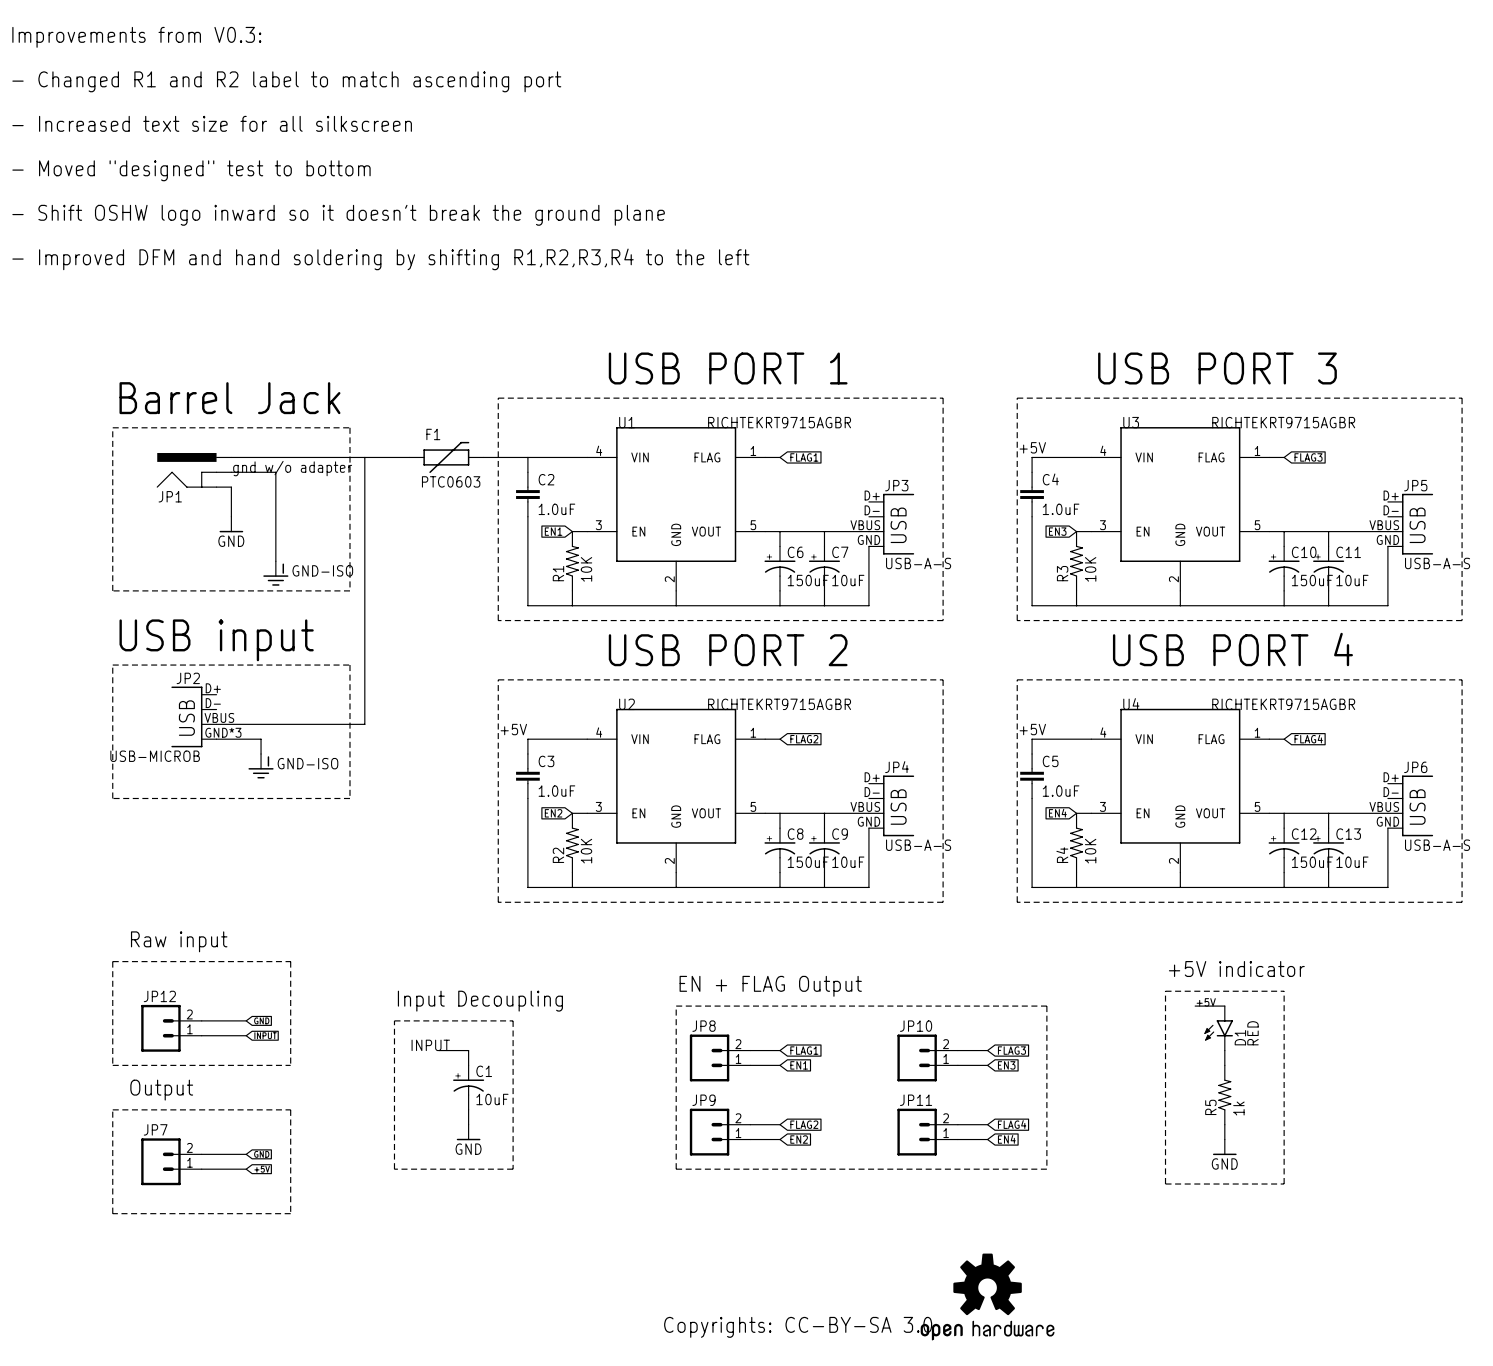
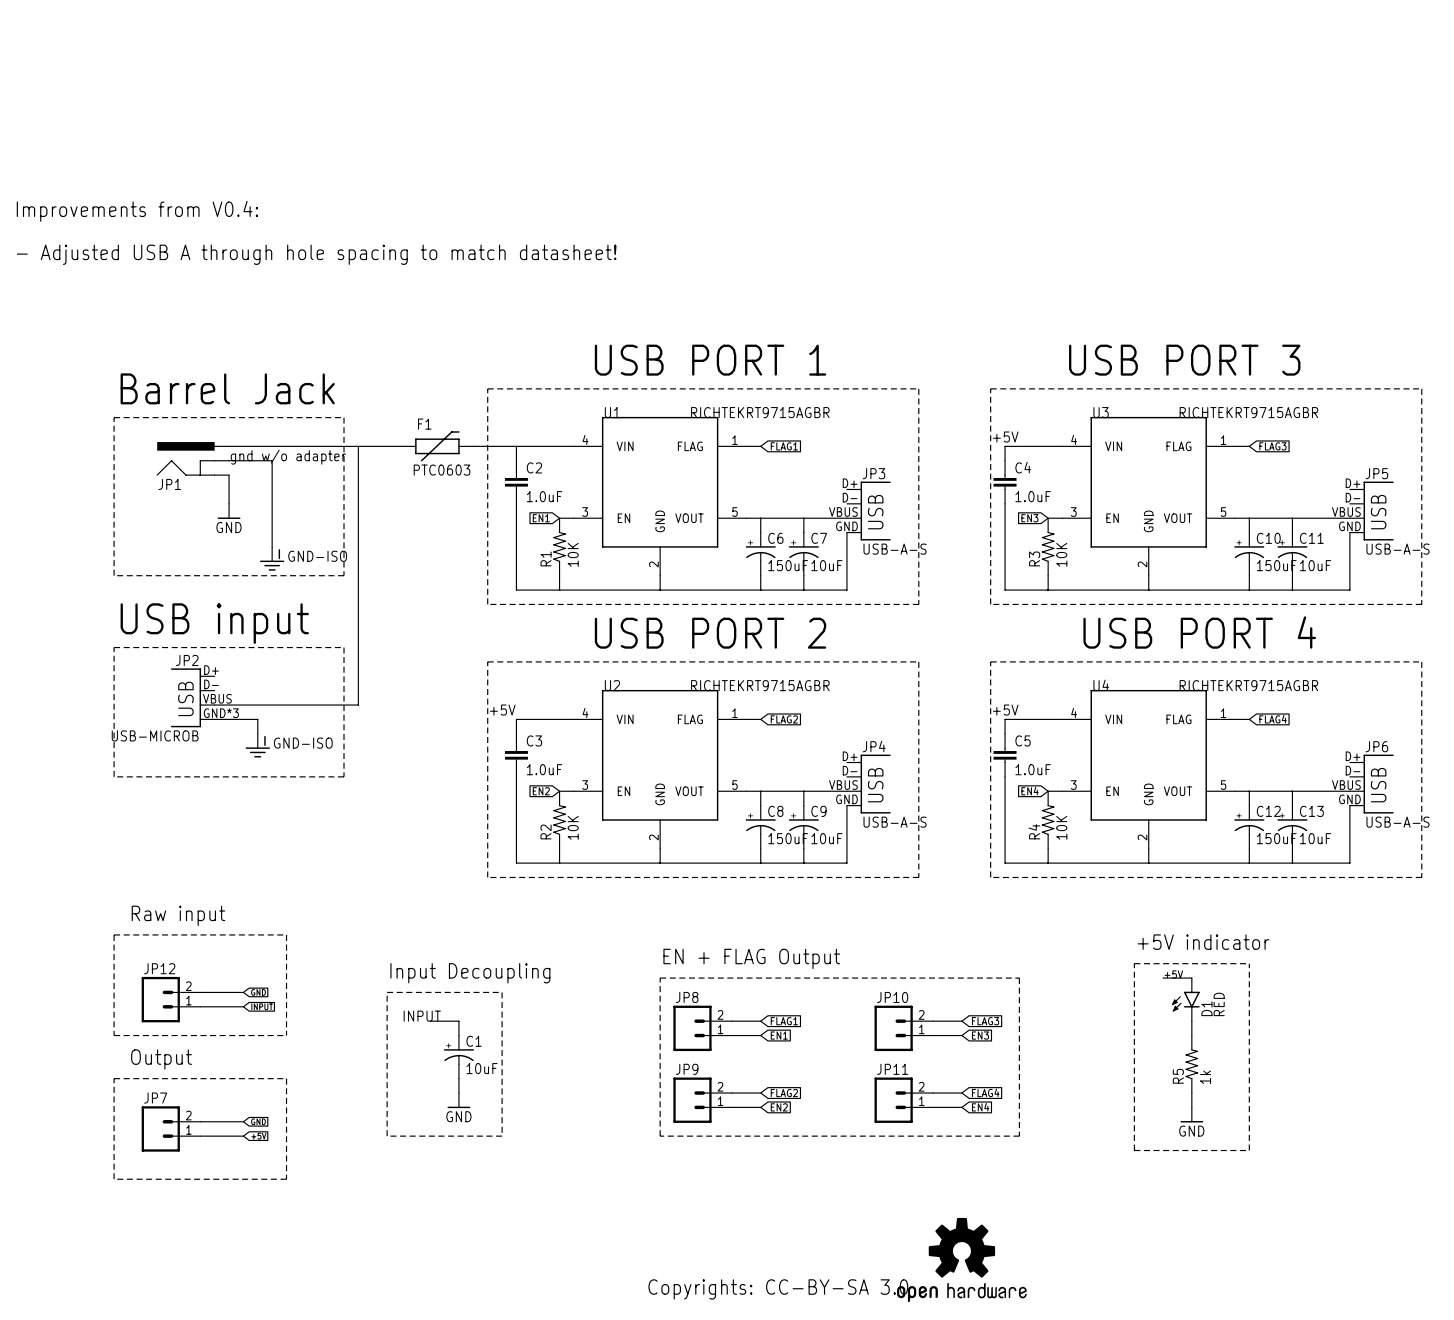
text: Improvements from V0.3: (136, 37) -> none
text: - Changed R1 and R2 label to match ascending port (286, 81) -> none
text: - Increased text size for all silkscreen (212, 123) -> none
text: - Moved "designed" test to bottom (191, 170) -> none
text: - Shift OSHW logo inward so it doesn't break the ground plane (338, 215) -> Improvements from V0.4: (137, 211)
text: - Improved DFM and hand soldering by shifting R1,R2,R3,R4 to the left (380, 259) -> - Adjusted USB A through hole spacing to match datasheet! (316, 254)

